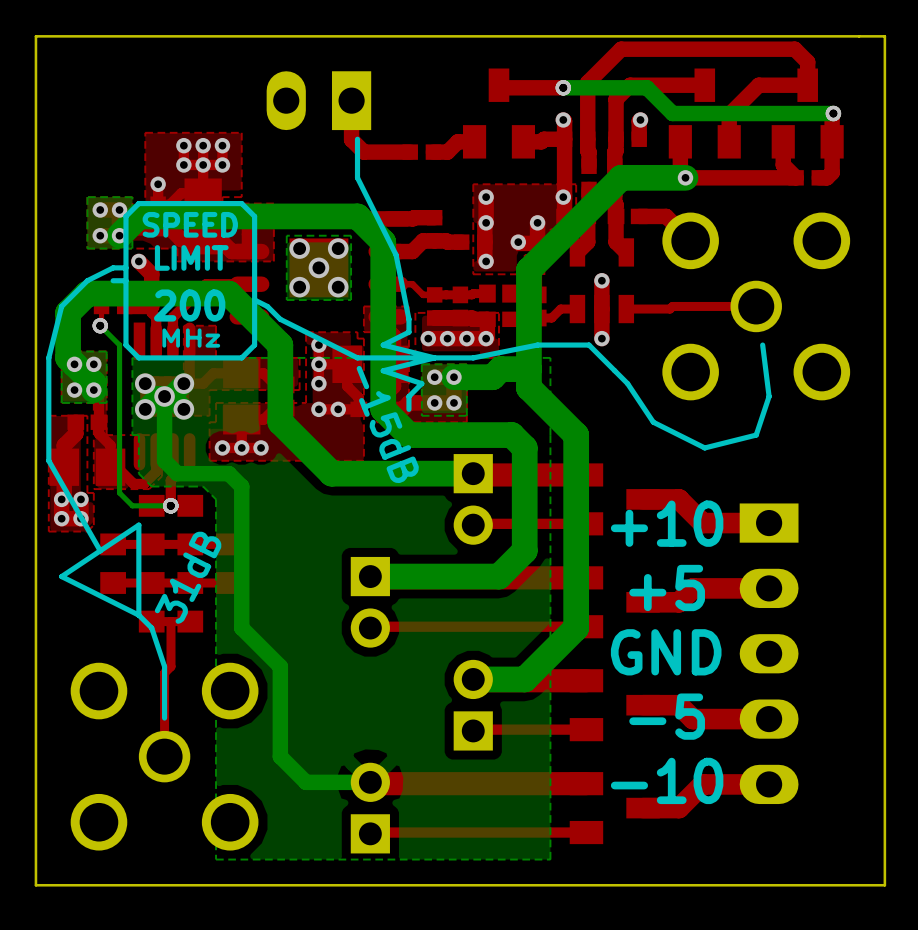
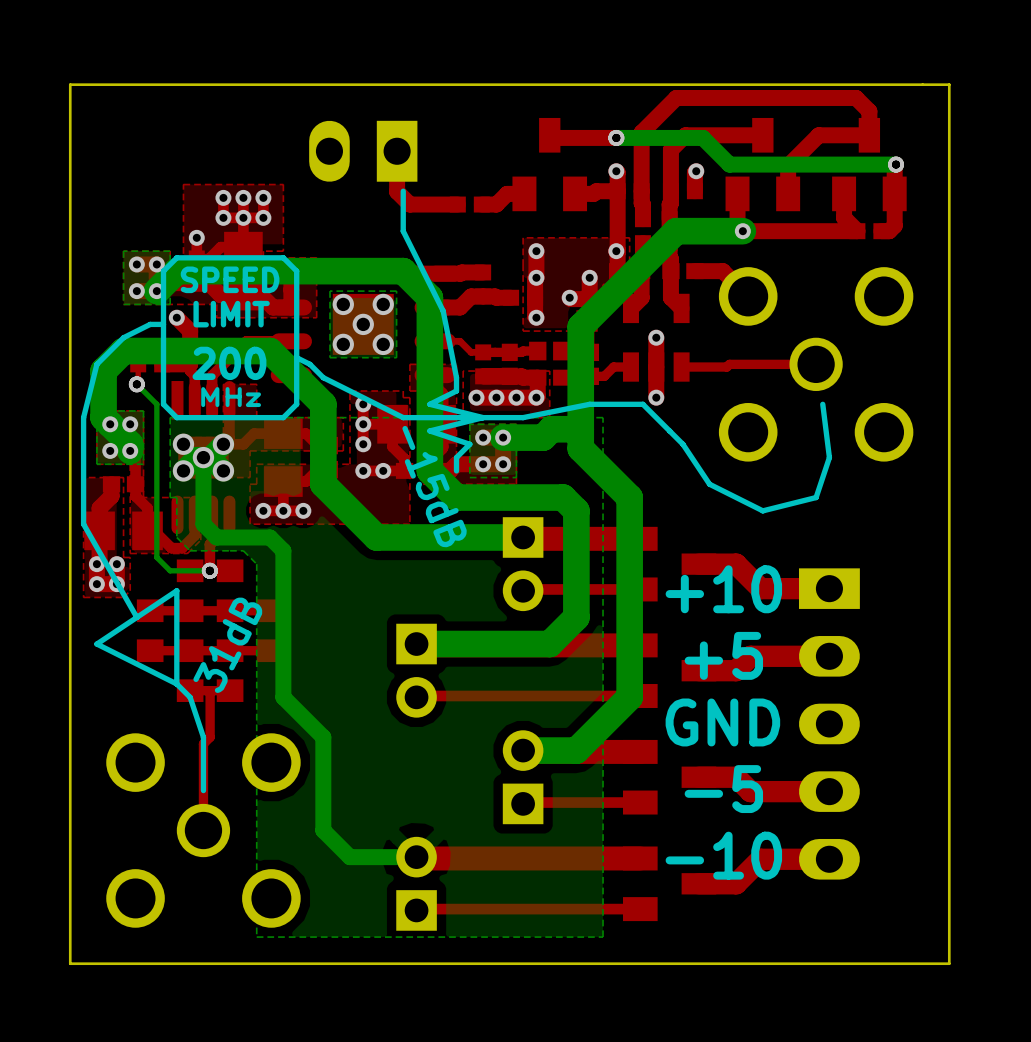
line: (125, 280) (113, 280) -> none

